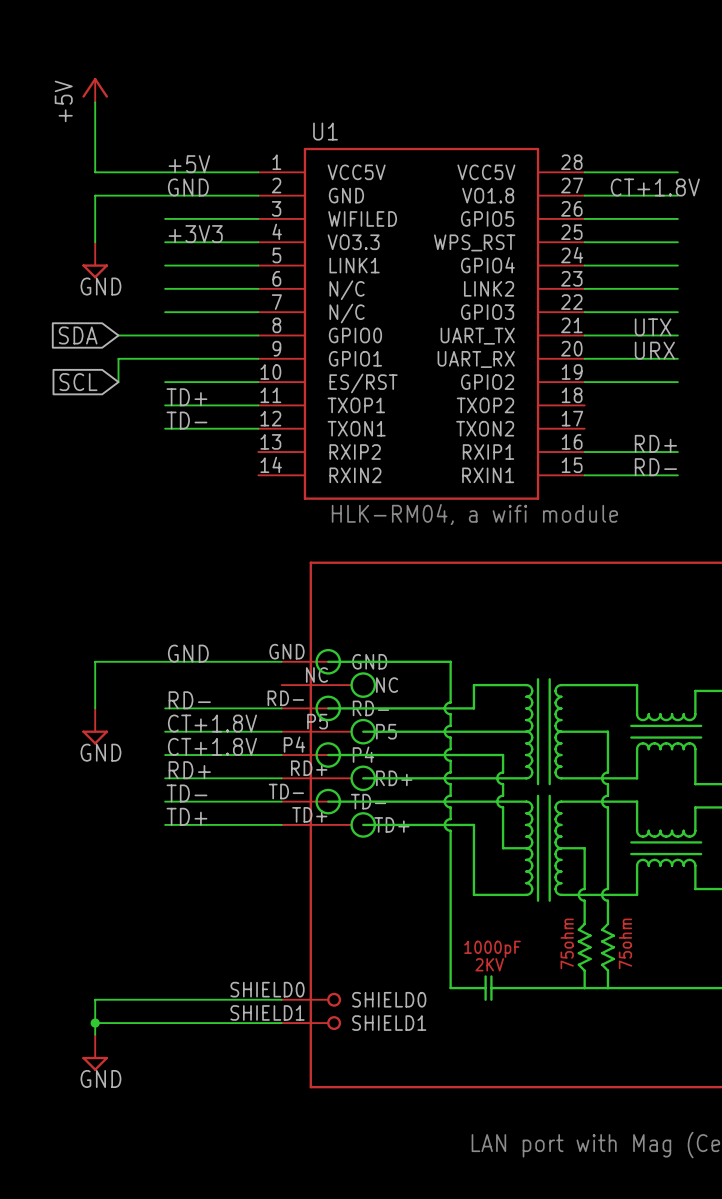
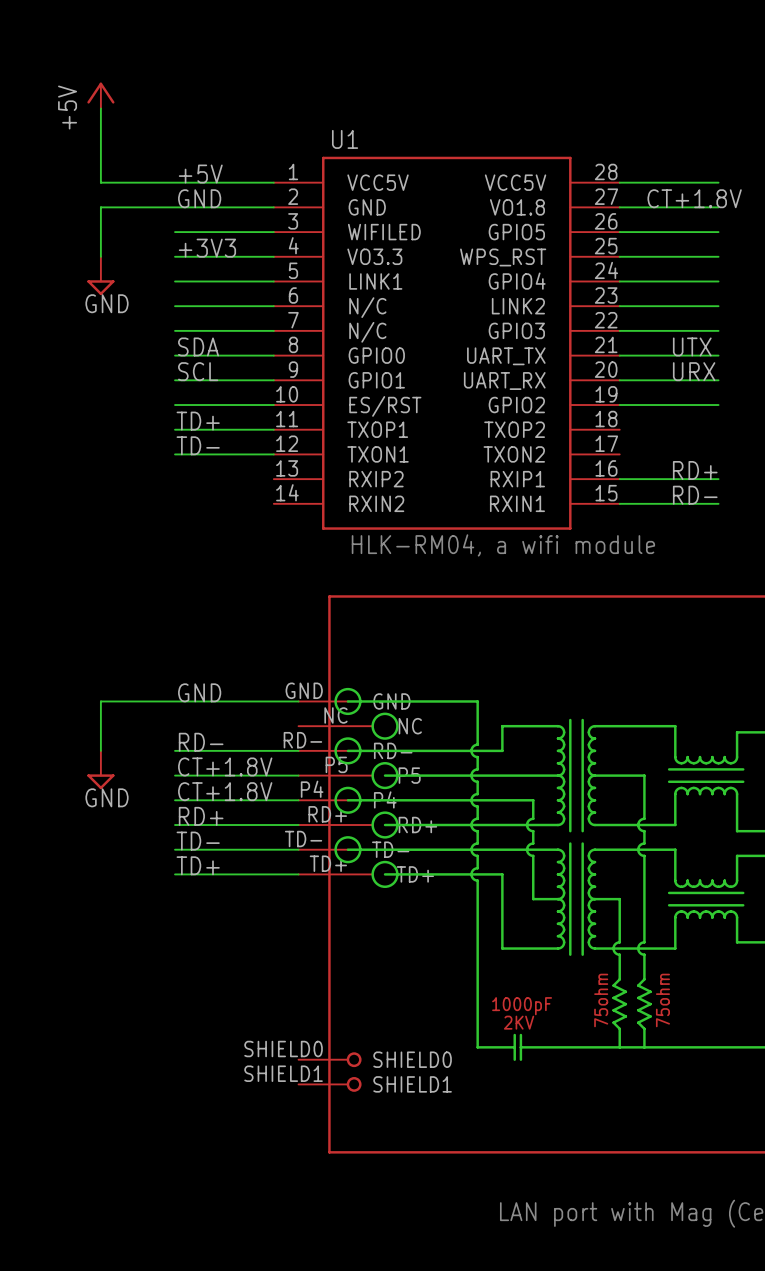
label: none -> SDA (198, 346)
global label: SDA (78, 335) -> none
wire: (118, 335) (165, 335) -> none
label: none -> SCL (198, 371)
wire: (165, 358) (118, 358) (118, 382) -> none
global label: SCL (78, 382) -> none
wire: (281, 999) (95, 999) (95, 1034) -> none
wire: (95, 1023) (281, 1023) -> none
junction: (95, 1023) -> none
power symbol: GND (95, 1052) -> none

